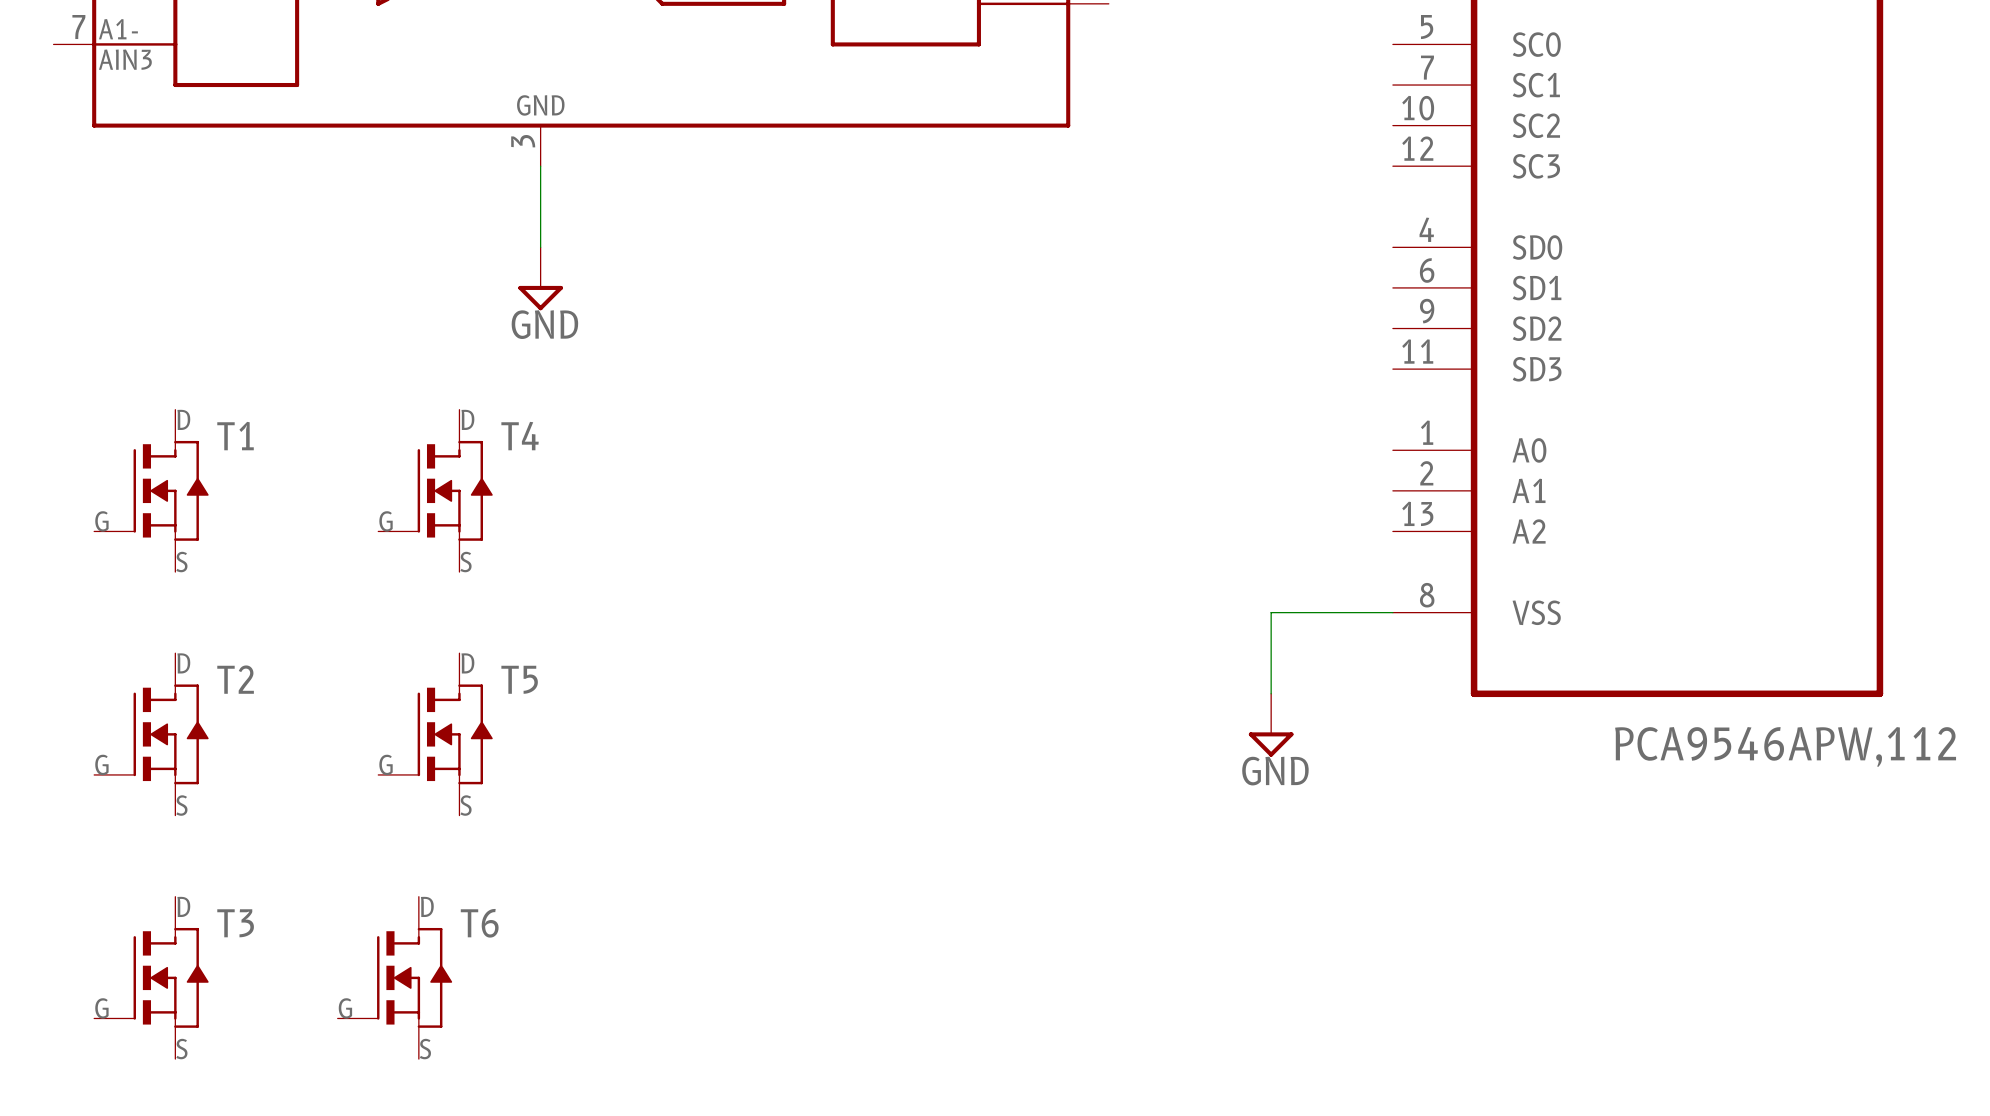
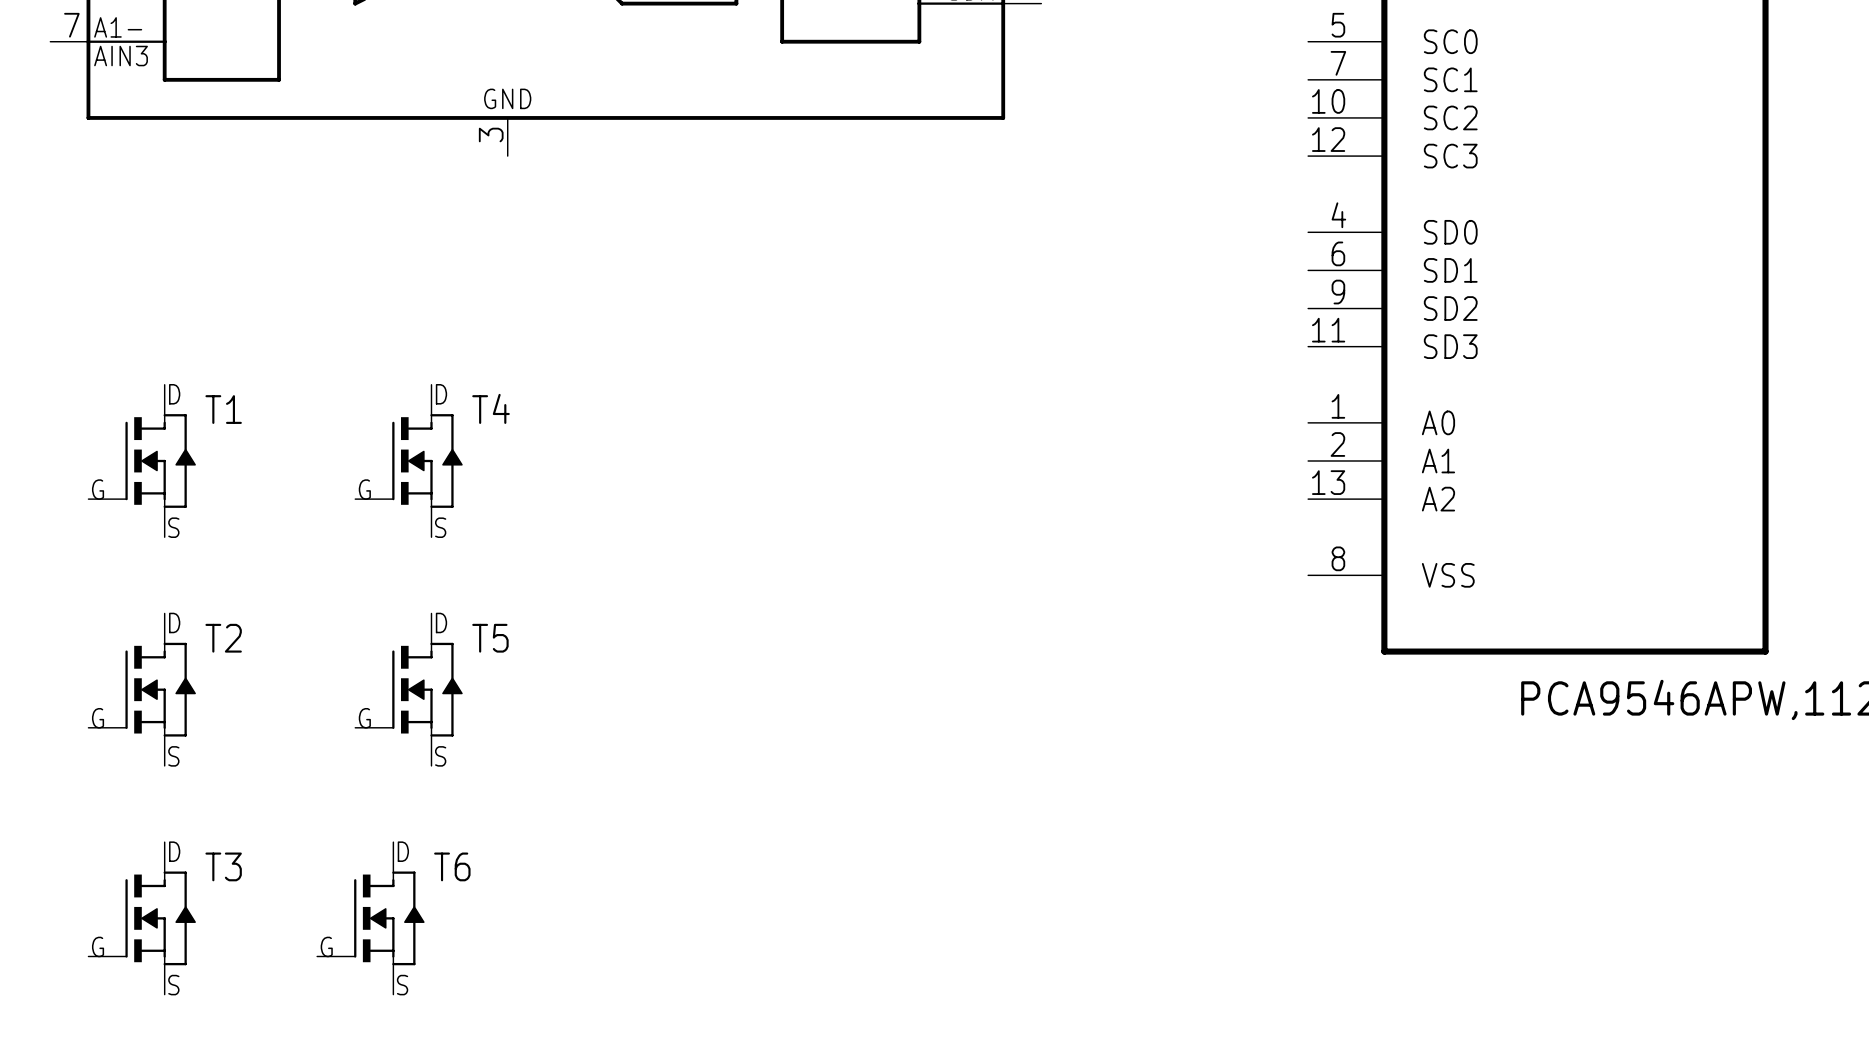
wire: (540, 166) (540, 247) -> none
power symbol: GND (540, 278) -> none
wire: (1392, 612) (1271, 612) (1271, 693) -> none
power symbol: GND (1271, 725) -> none

